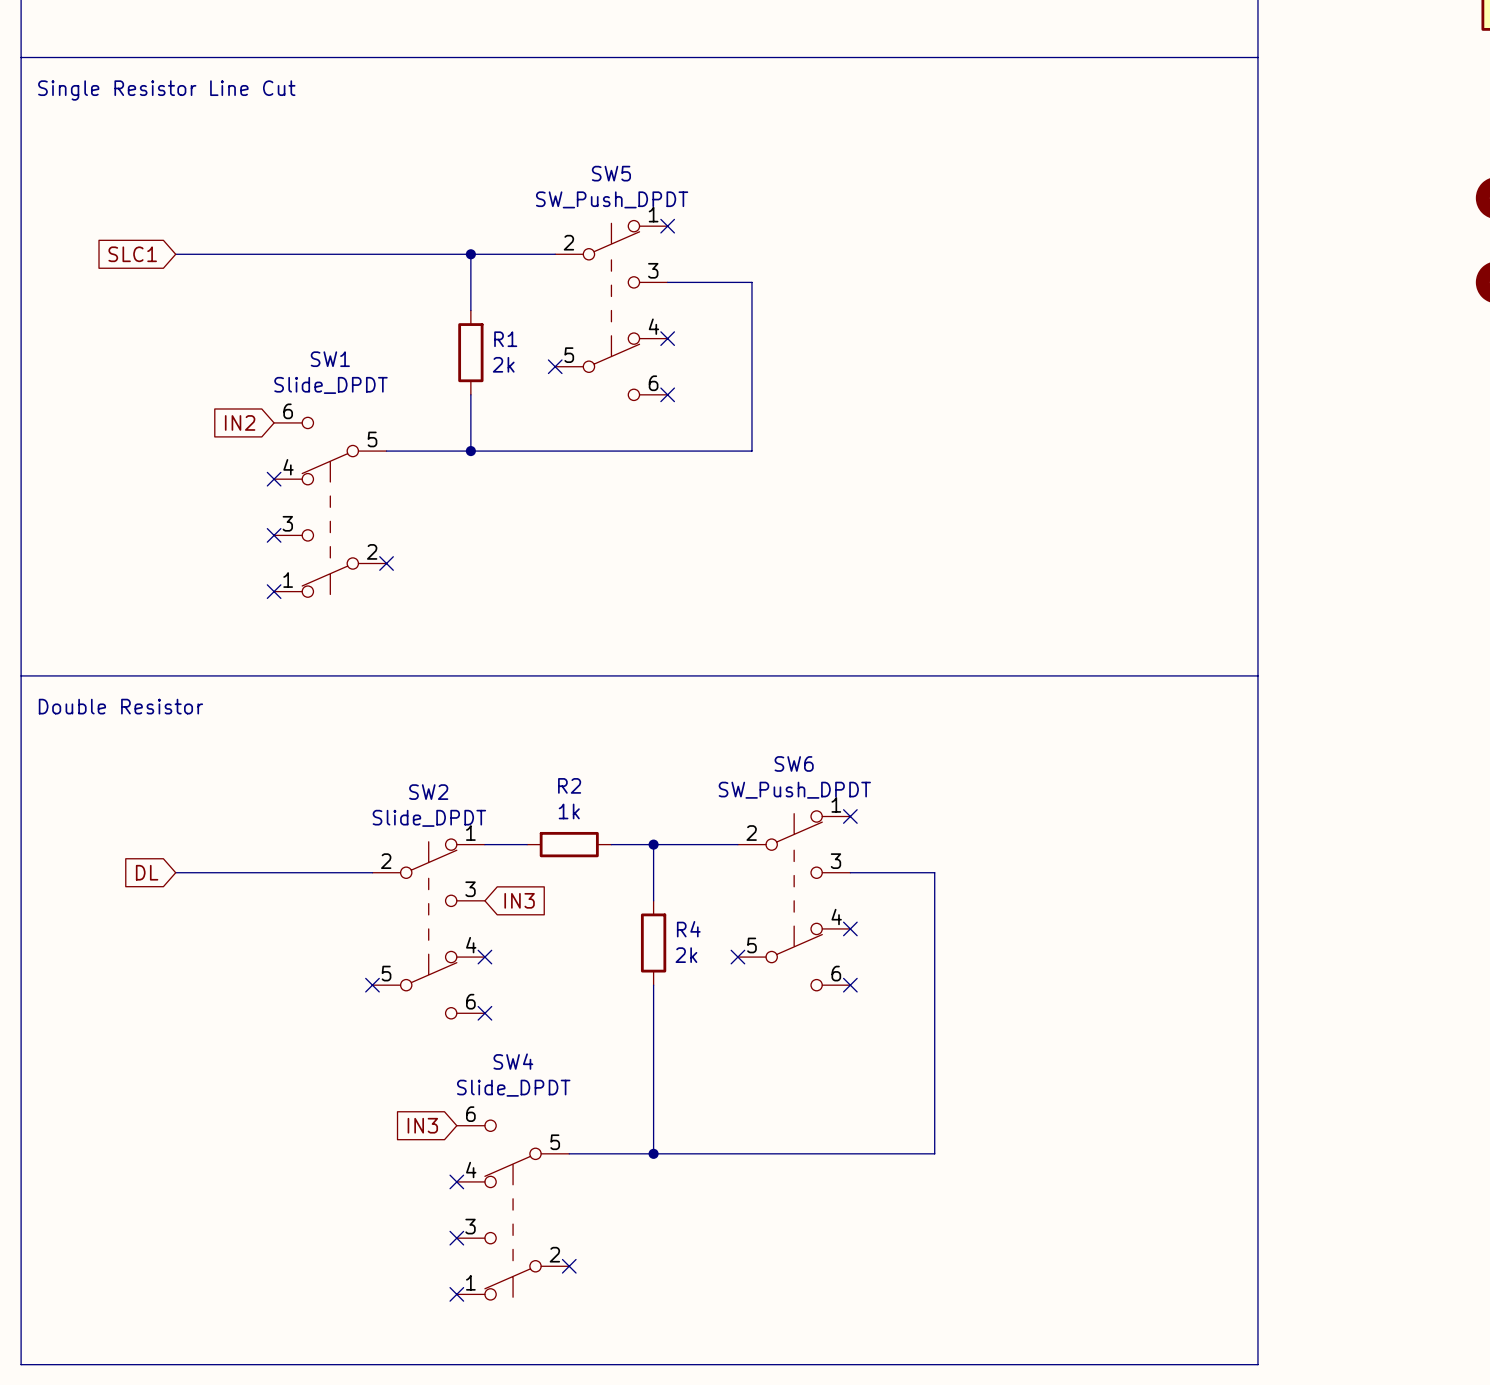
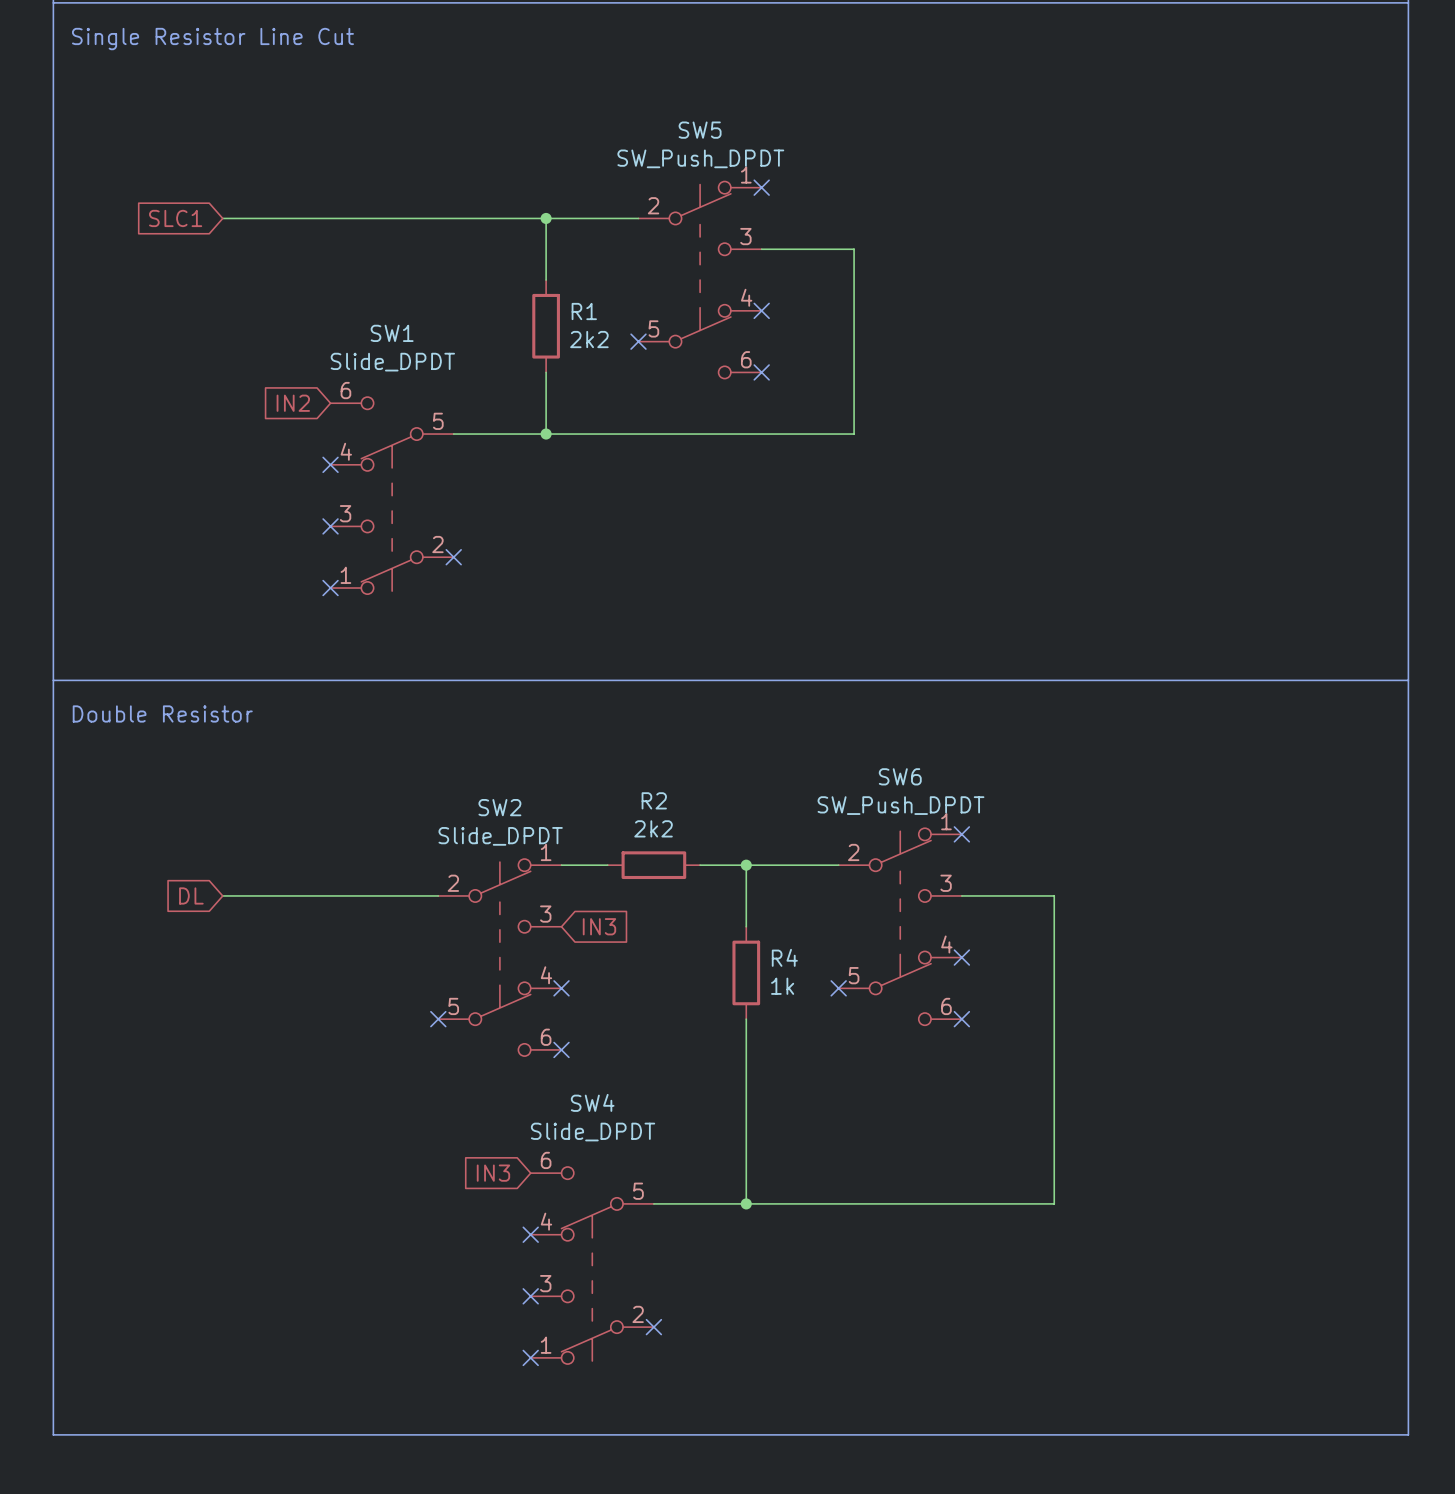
R1 value: 2k (503, 364) -> 2k2 (589, 339)
R2 value: 1k (569, 811) -> 2k2 (653, 828)
R4 value: 2k (686, 955) -> 1k (782, 986)

